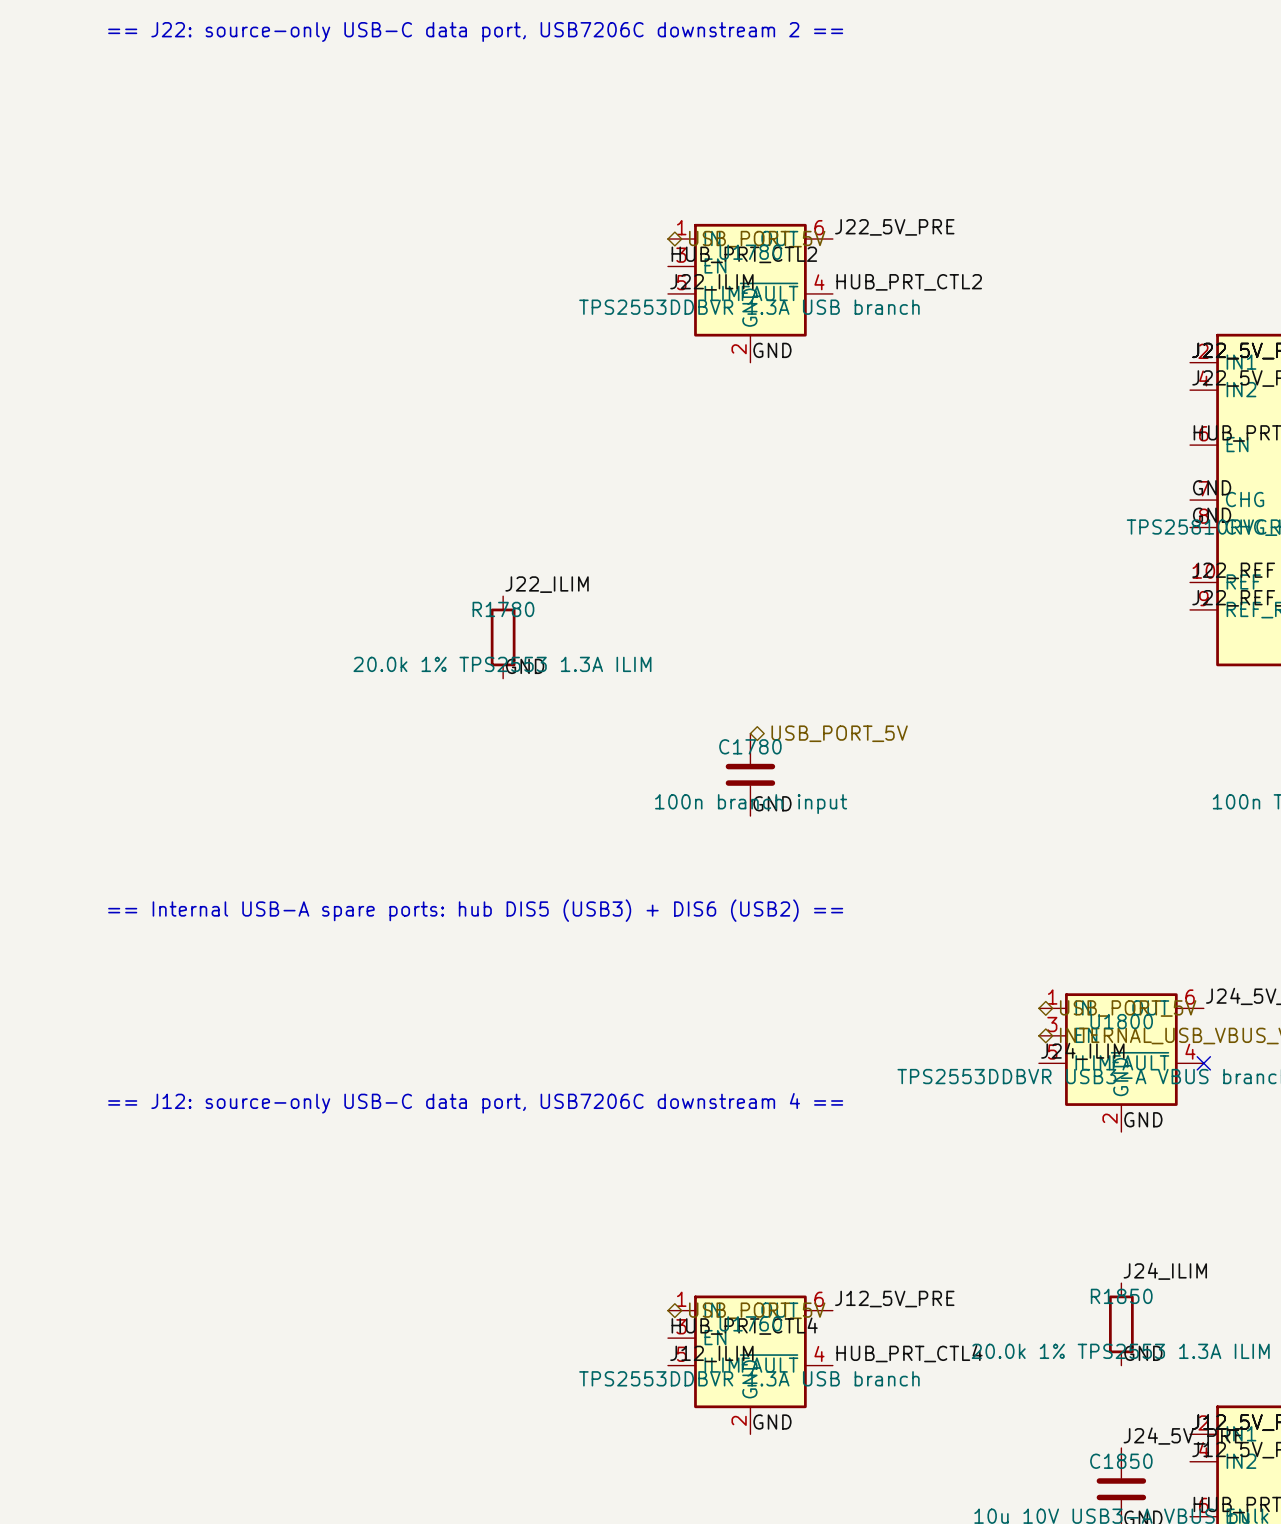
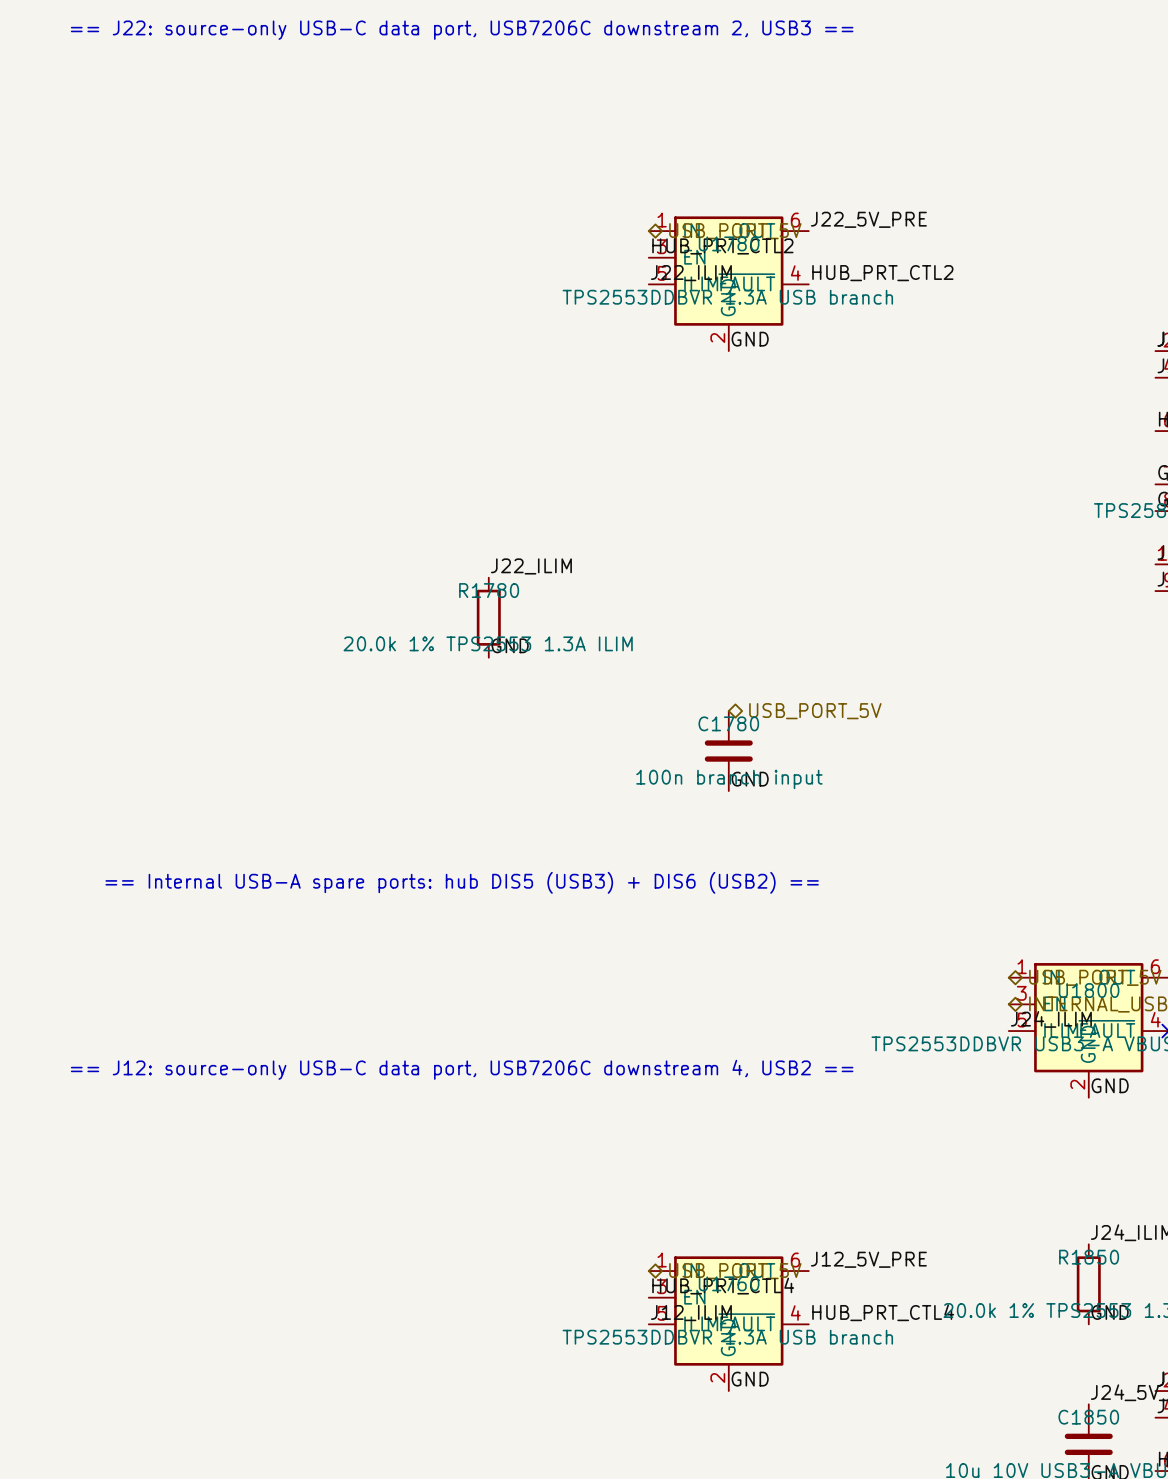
text: == J22: source-only USB-C data port, USB7206C downstream 2 == (475, 32) -> == J22: source-only USB-C data port, USB7206C downstream 2, USB3 == (462, 30)
text: == J12: source-only USB-C data port, USB7206C downstream 4 == (475, 1103) -> == J12: source-only USB-C data port, USB7206C downstream 4, USB2 == (462, 1069)

